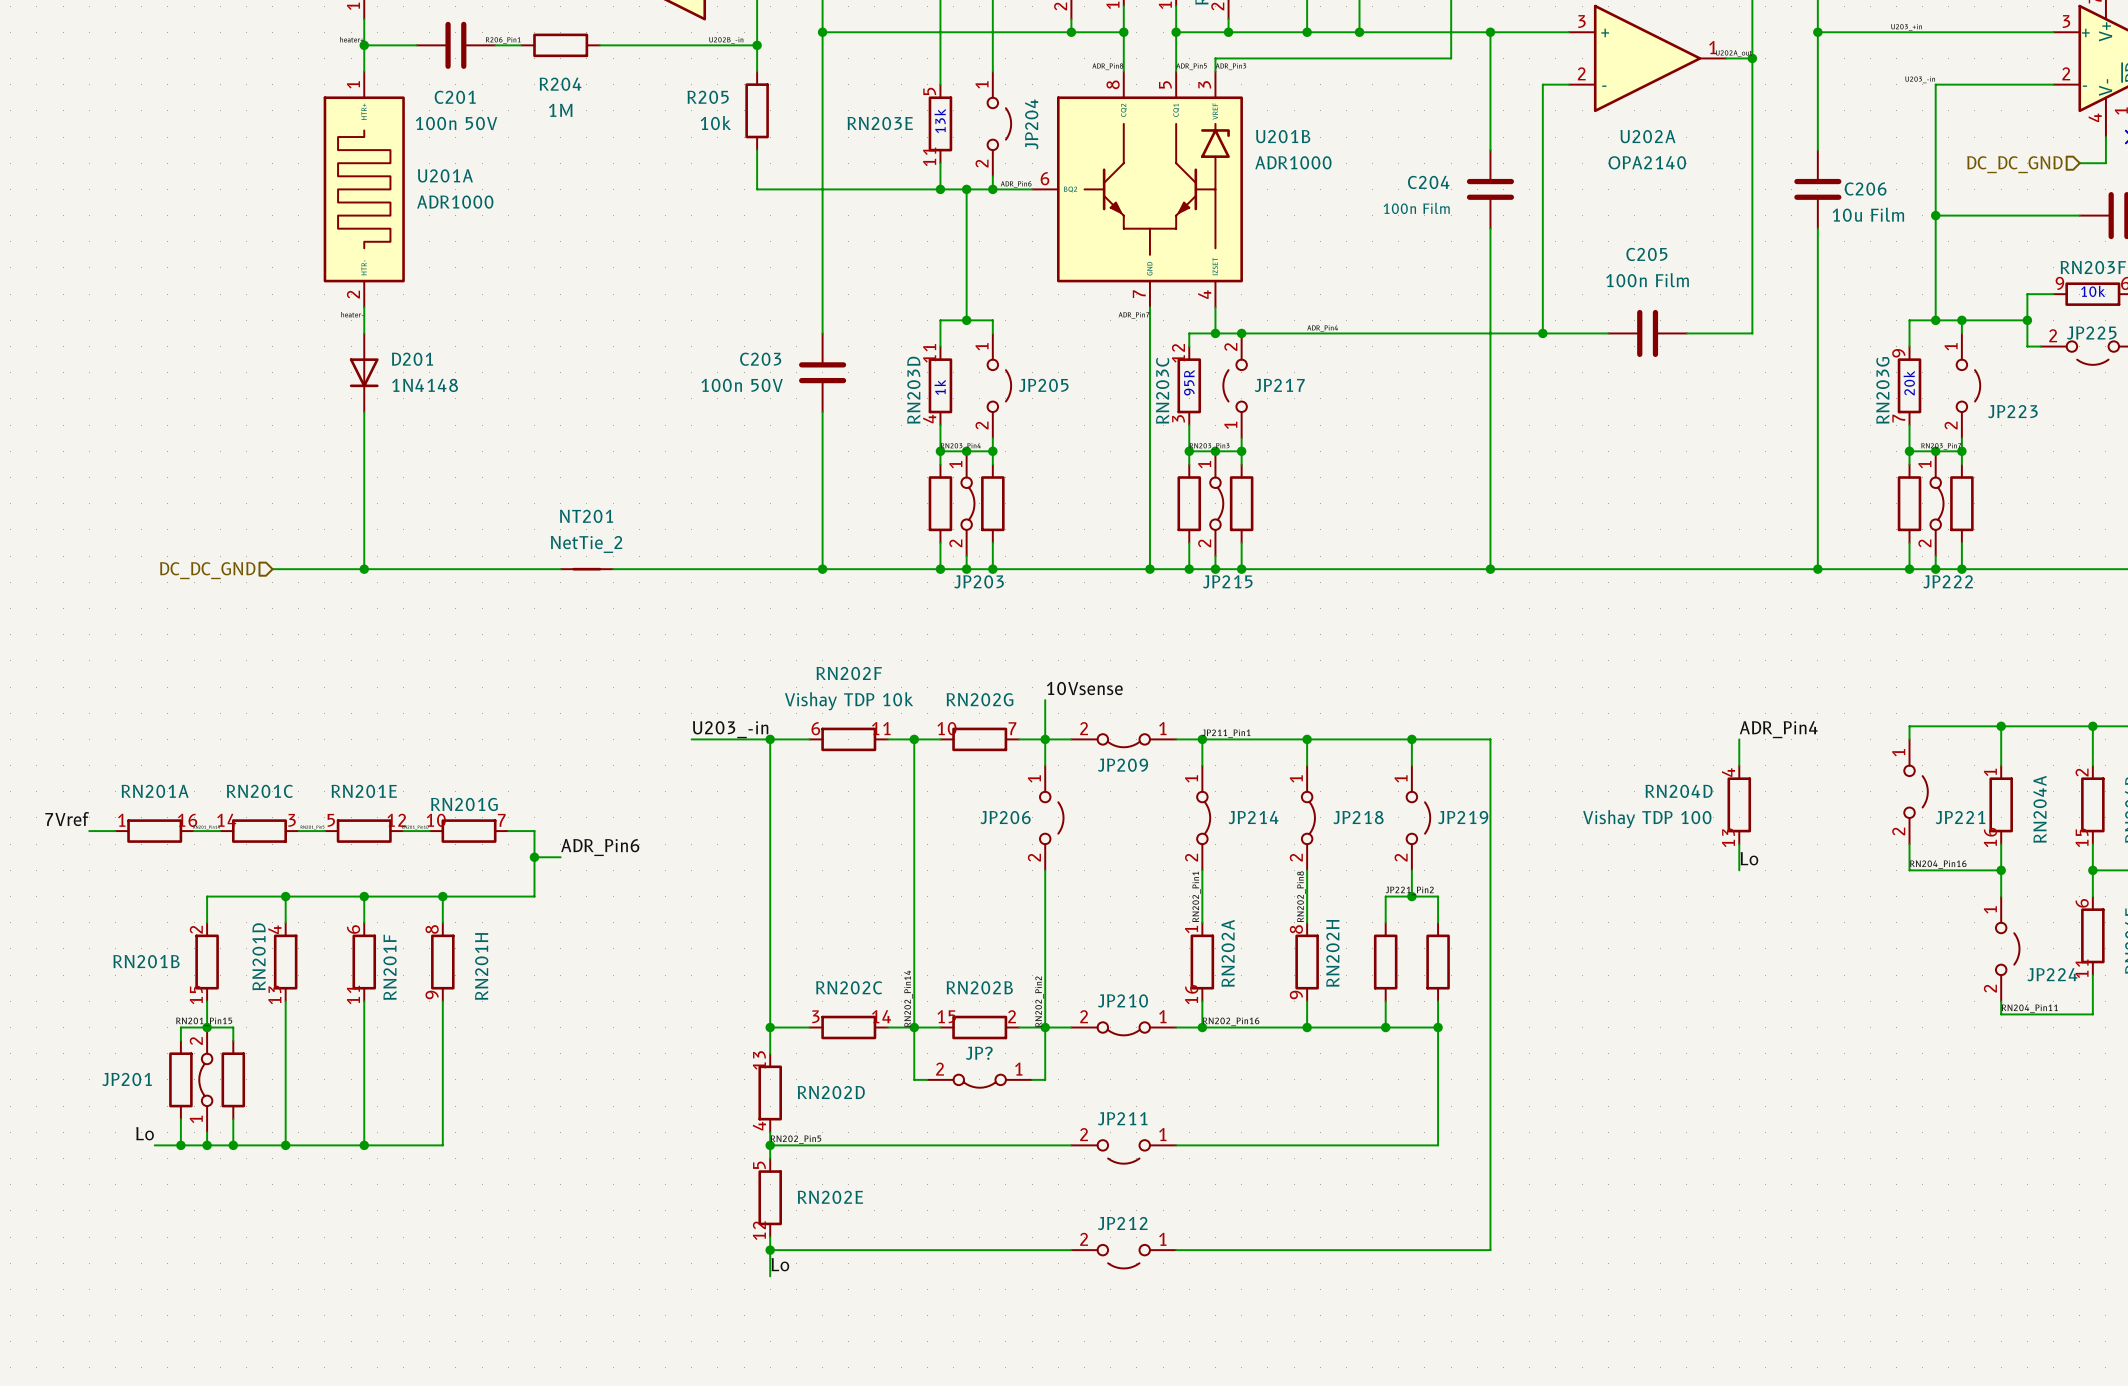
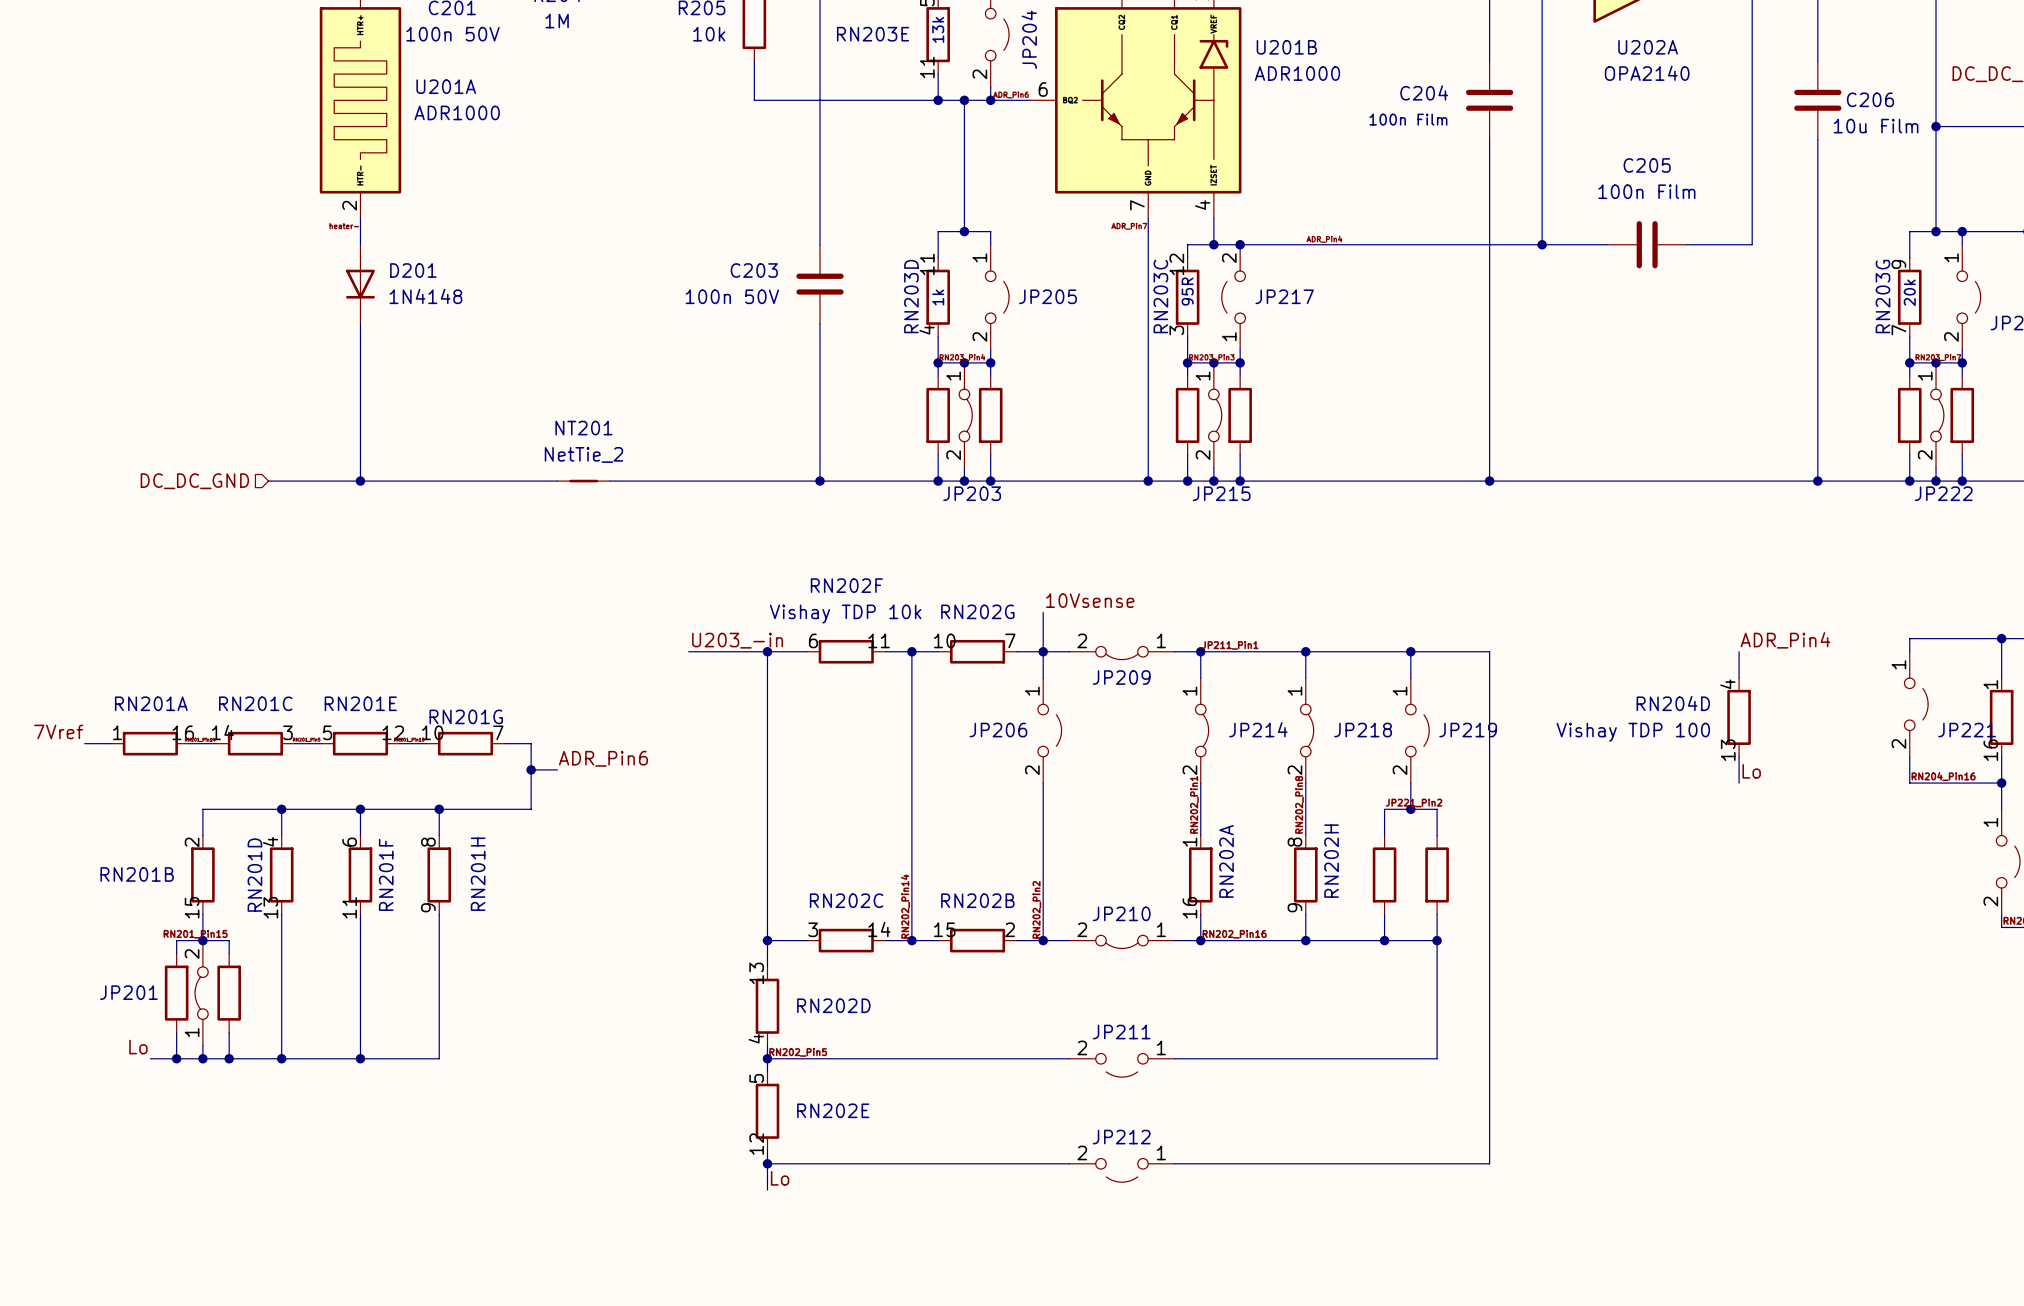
wire: (914, 1027) (914, 1079) (927, 1079) -> none
wire: (1045, 1027) (1045, 1079) (1032, 1079) -> none
JP?: (979, 1081) -> none

